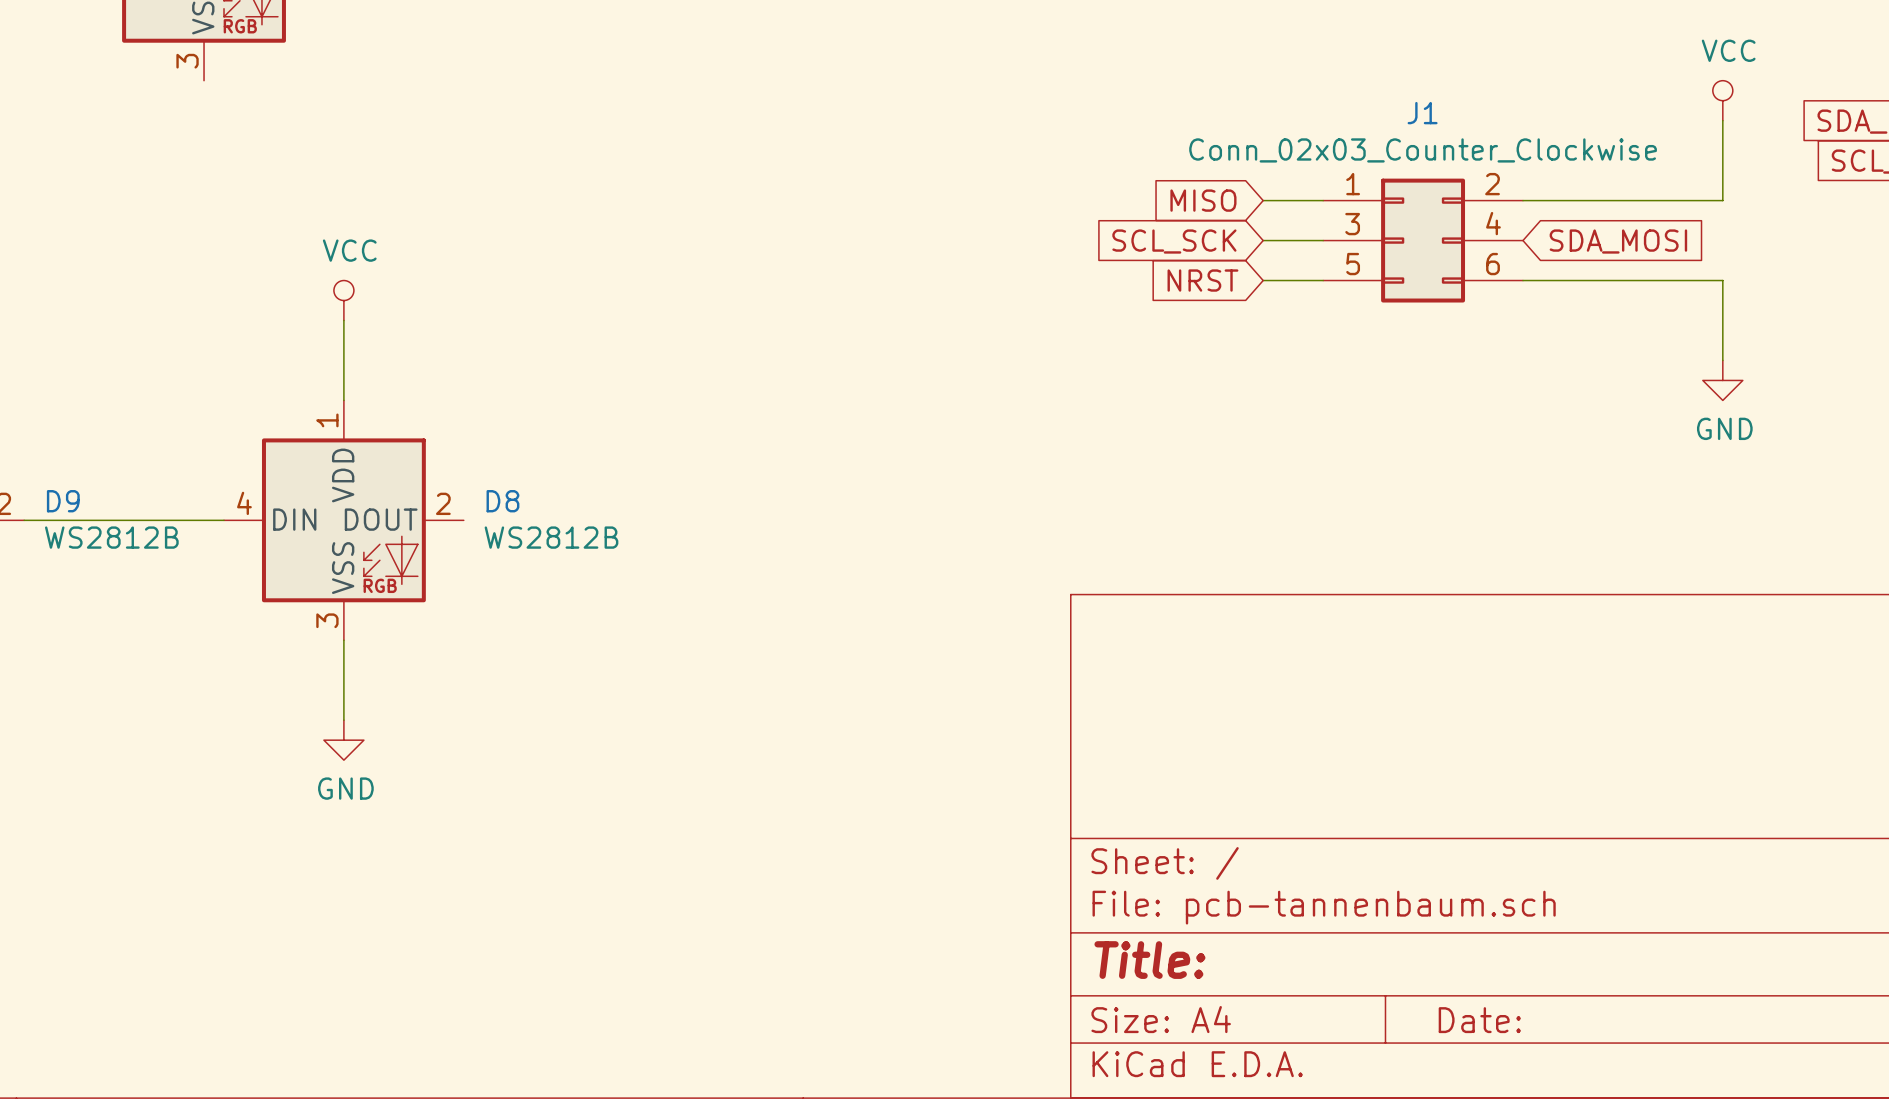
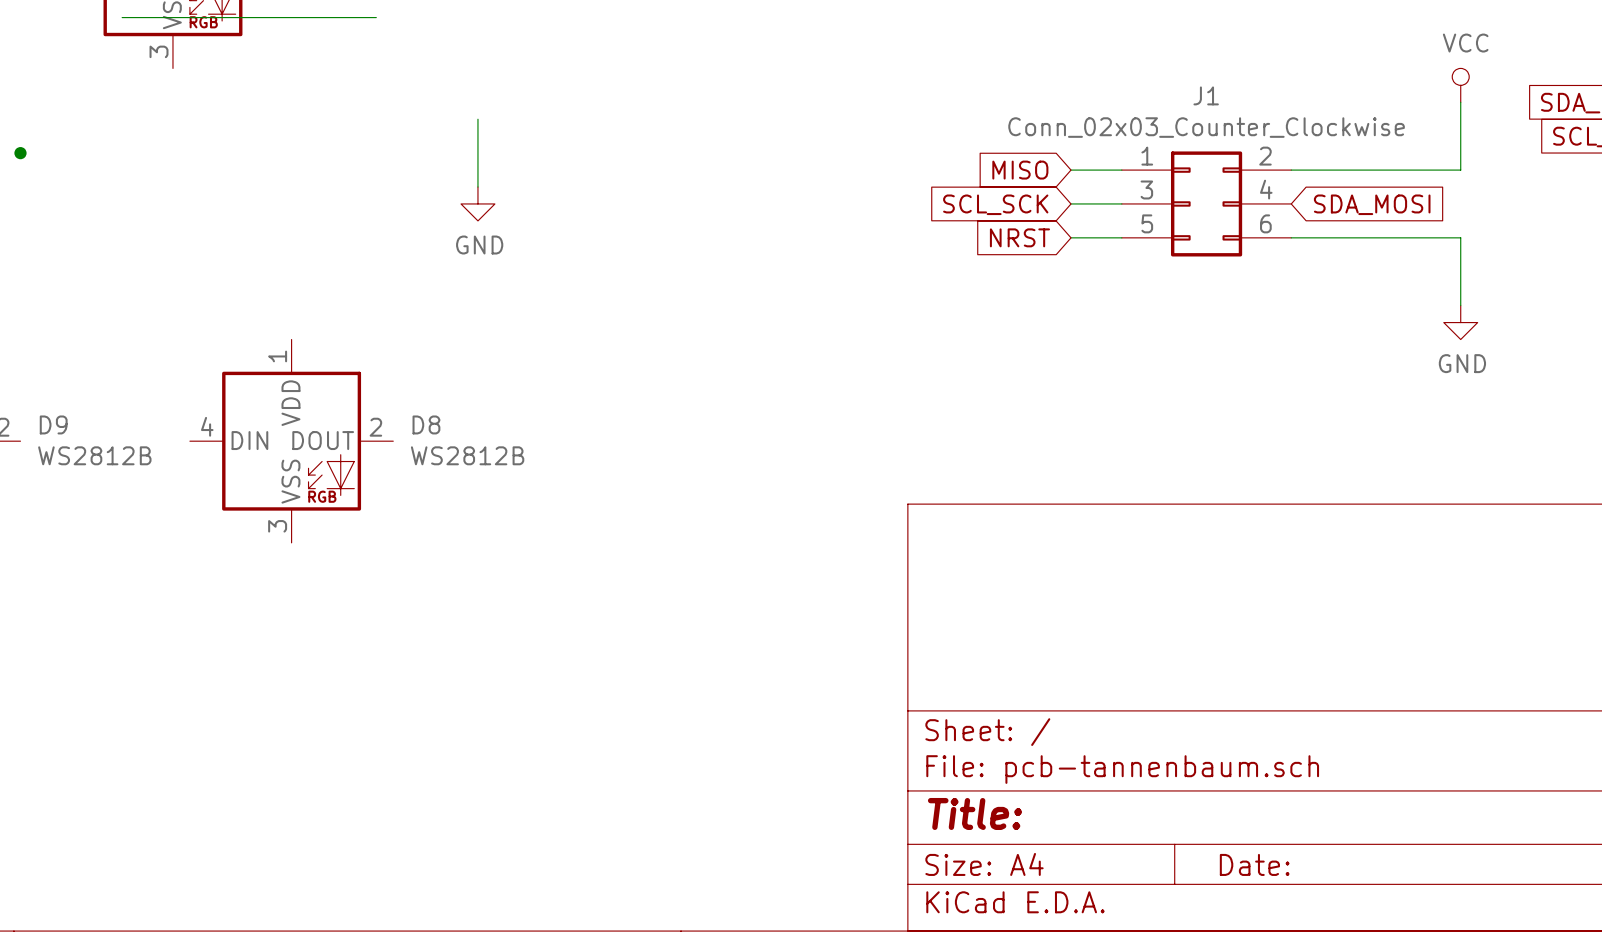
wire: none -> (122, 17) (376, 17)
junction: none -> (20, 153)
power symbol: none -> GND (477, 203)
power symbol: VCC (343, 300) -> none
wire: (343, 320) (343, 400) -> (477, 119) (477, 187)
wire: (24, 520) (224, 520) -> none
wire: (343, 640) (343, 720) -> none
power symbol: GND (343, 740) -> none

